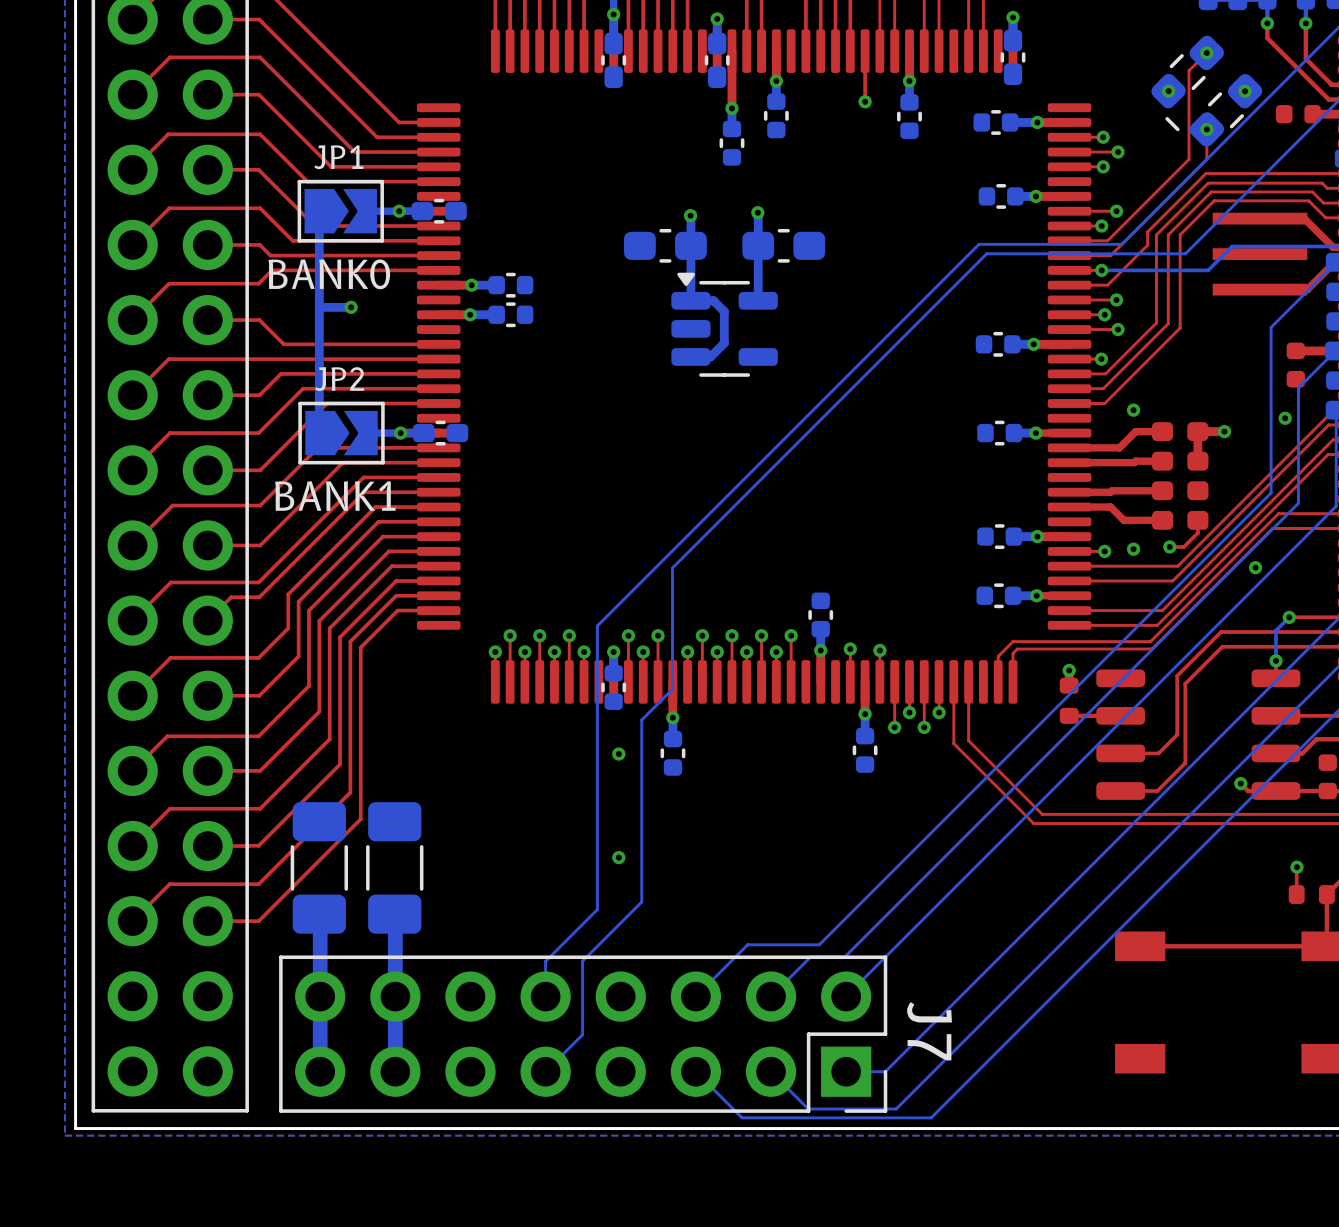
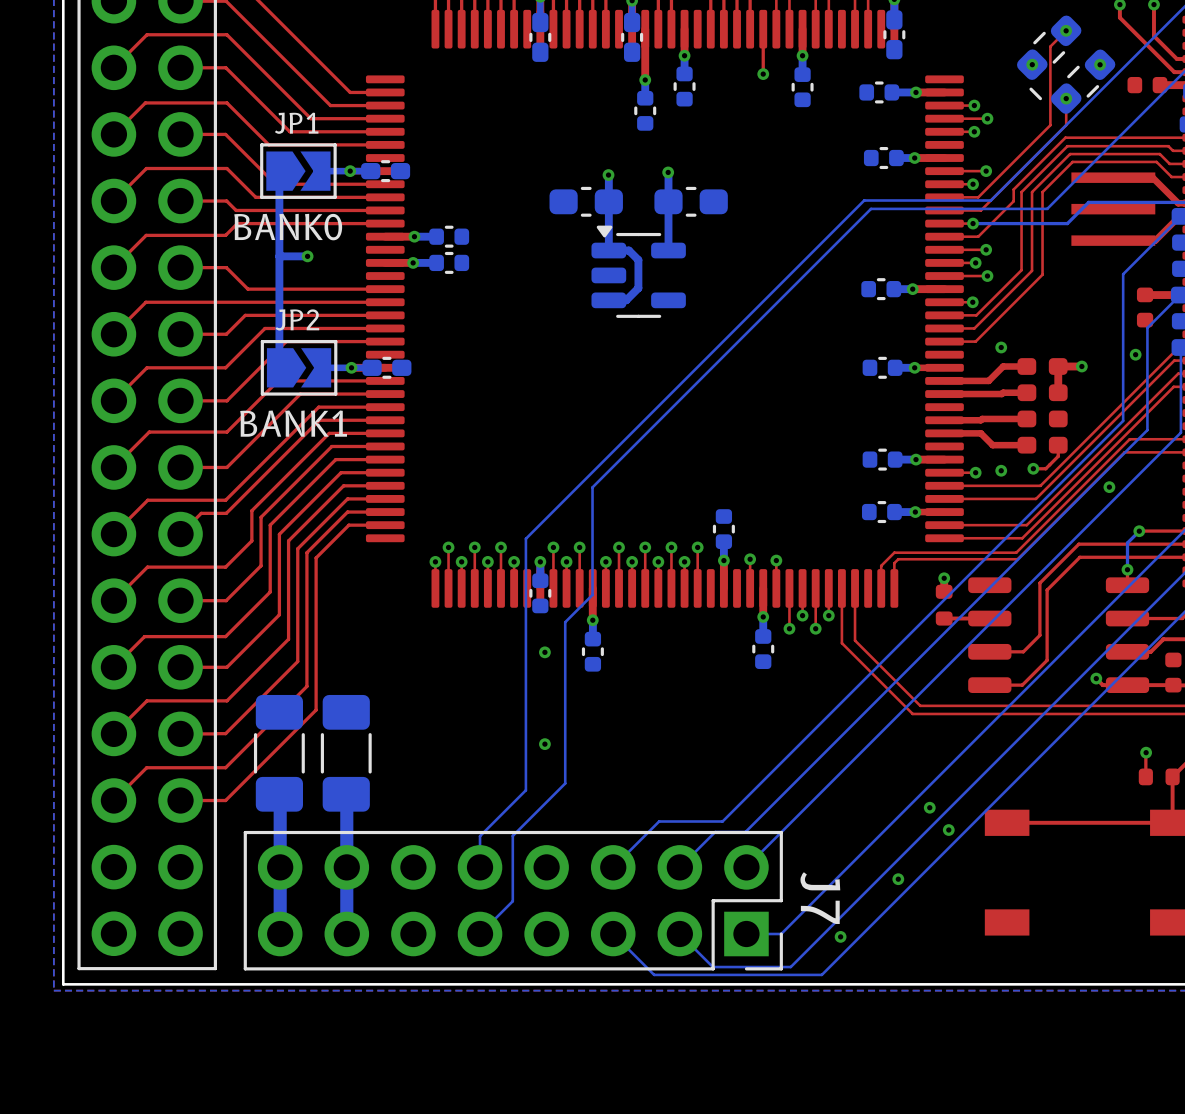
via: none -> (929, 807)
via: none -> (948, 830)
via: none -> (898, 879)
via: none -> (840, 936)

